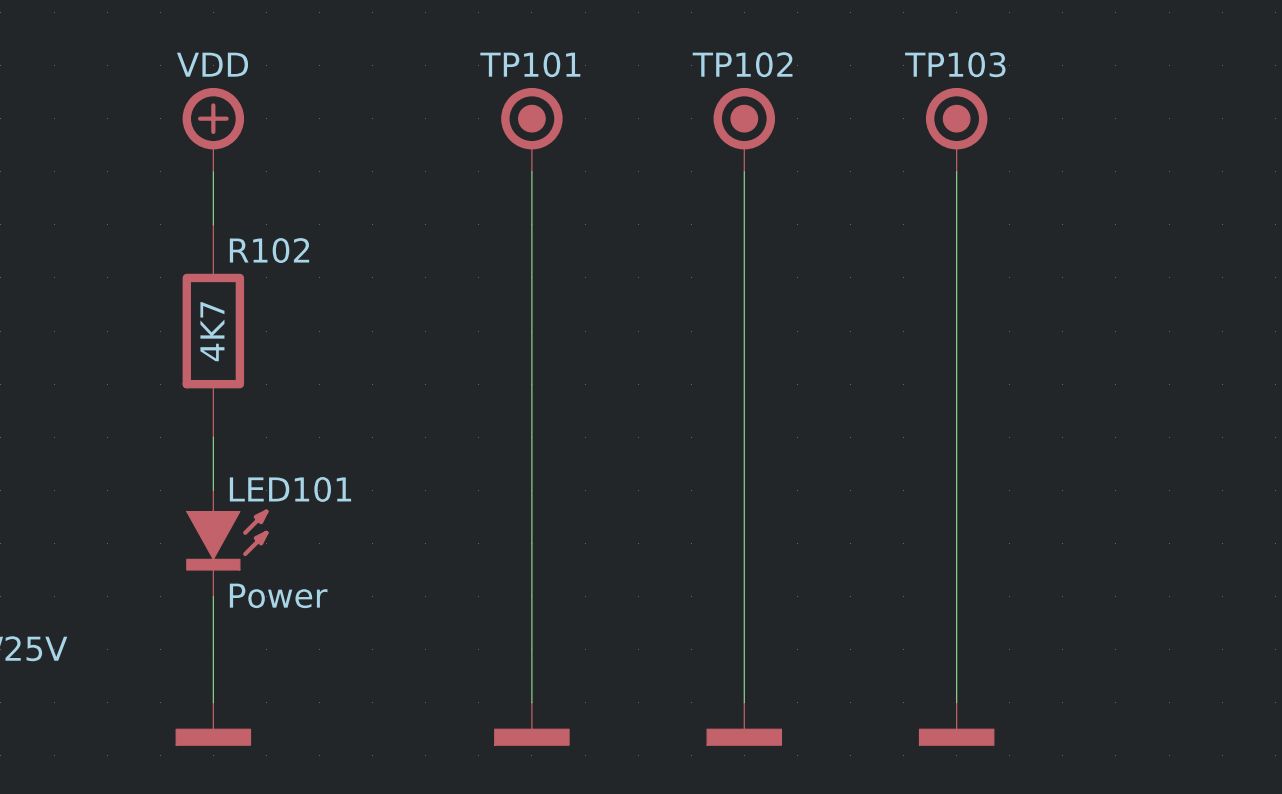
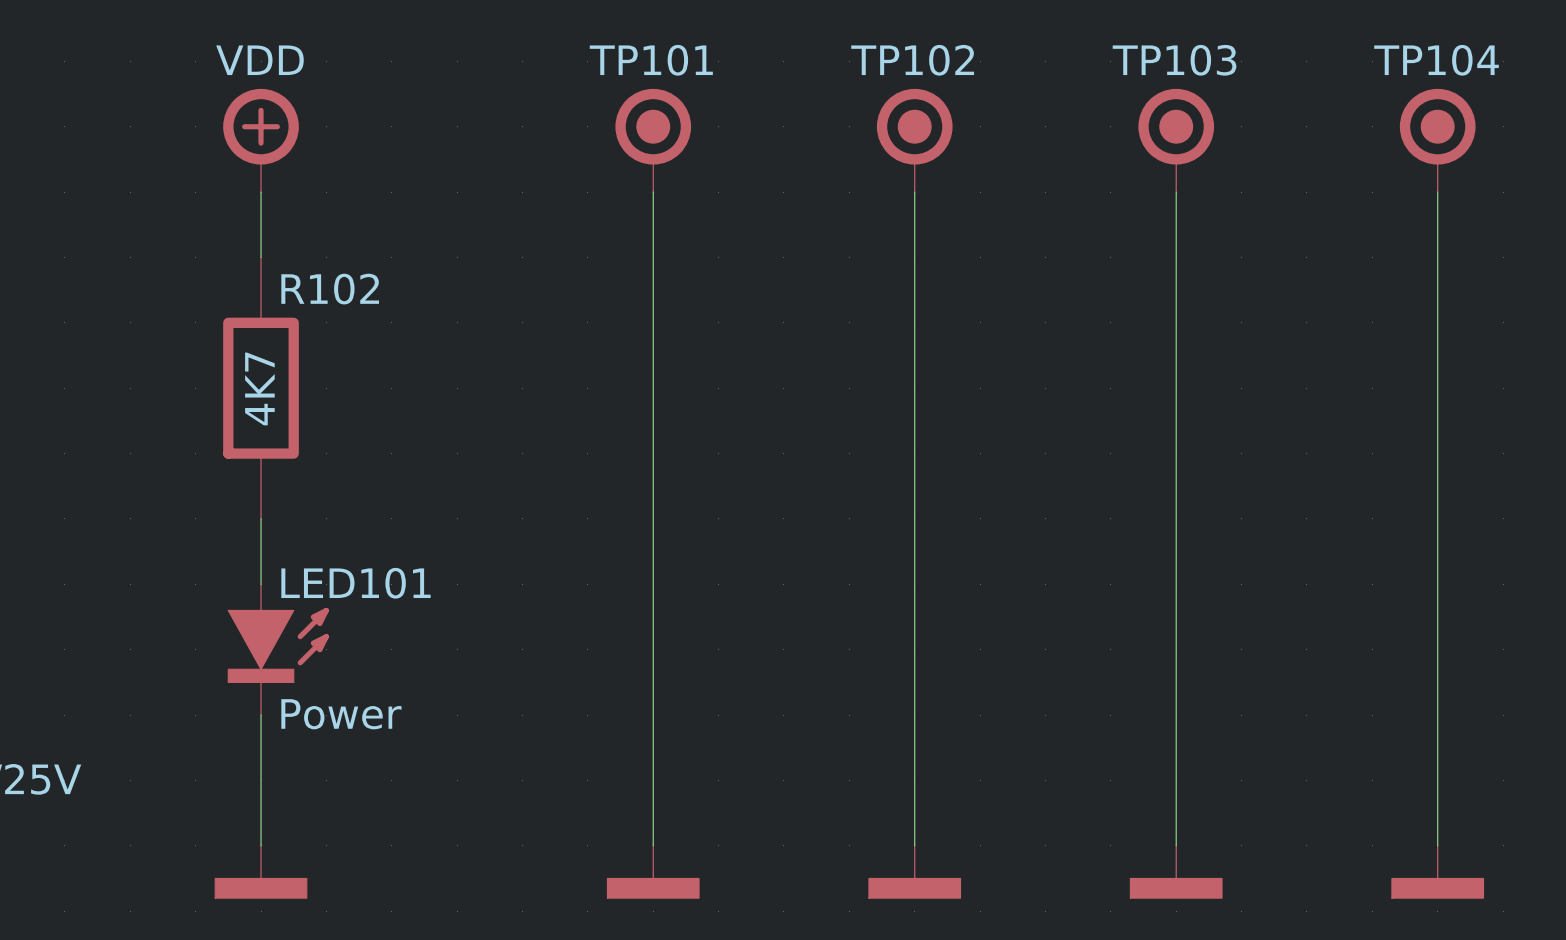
TP104: none -> (1437, 140)
wire: none -> (1437, 192) (1437, 845)
power symbol: none -> (1437, 871)

